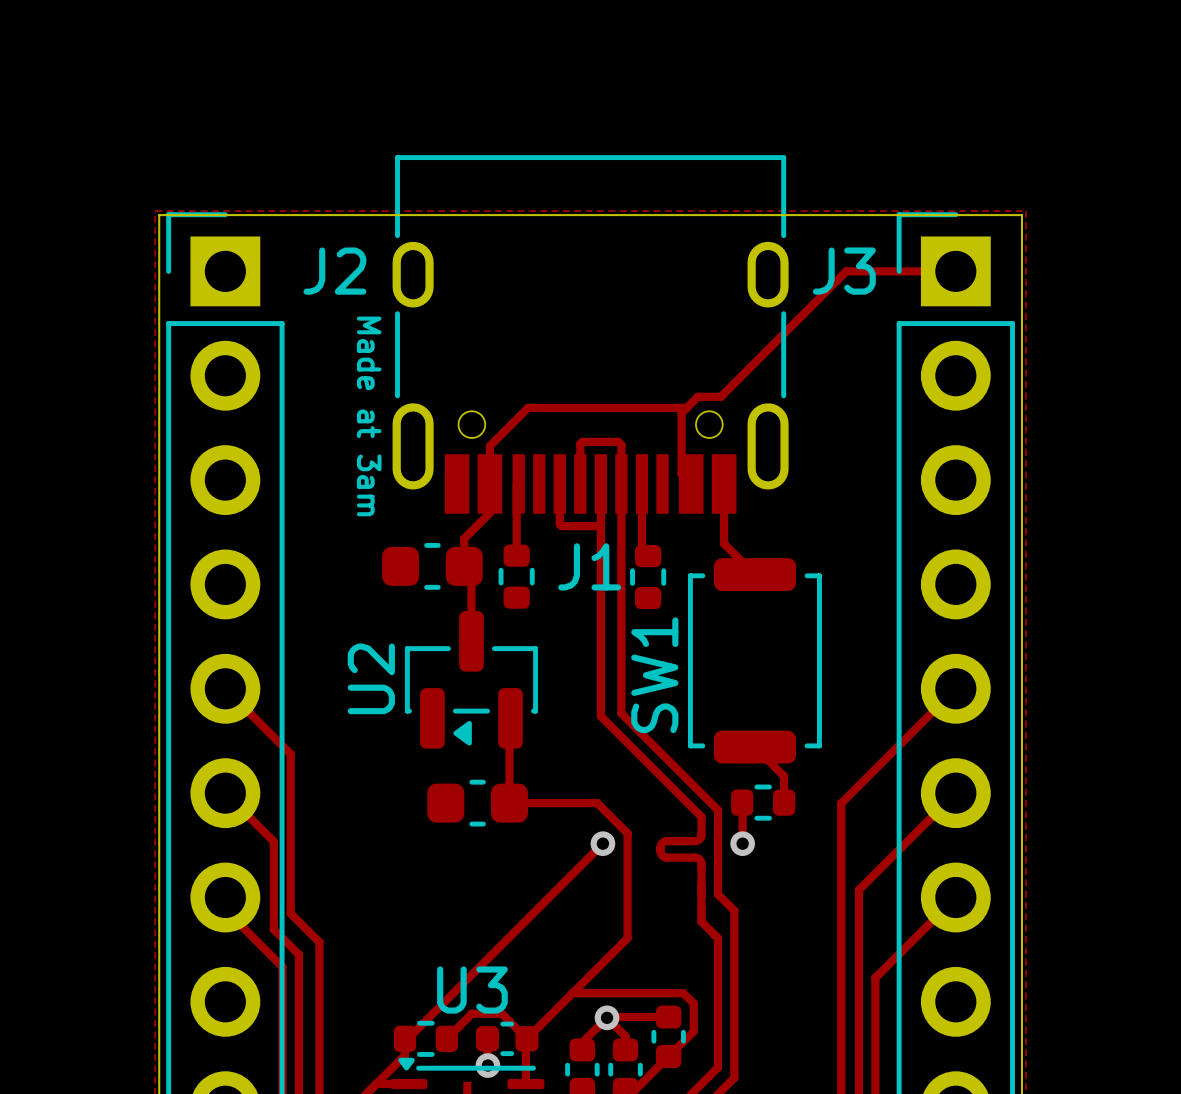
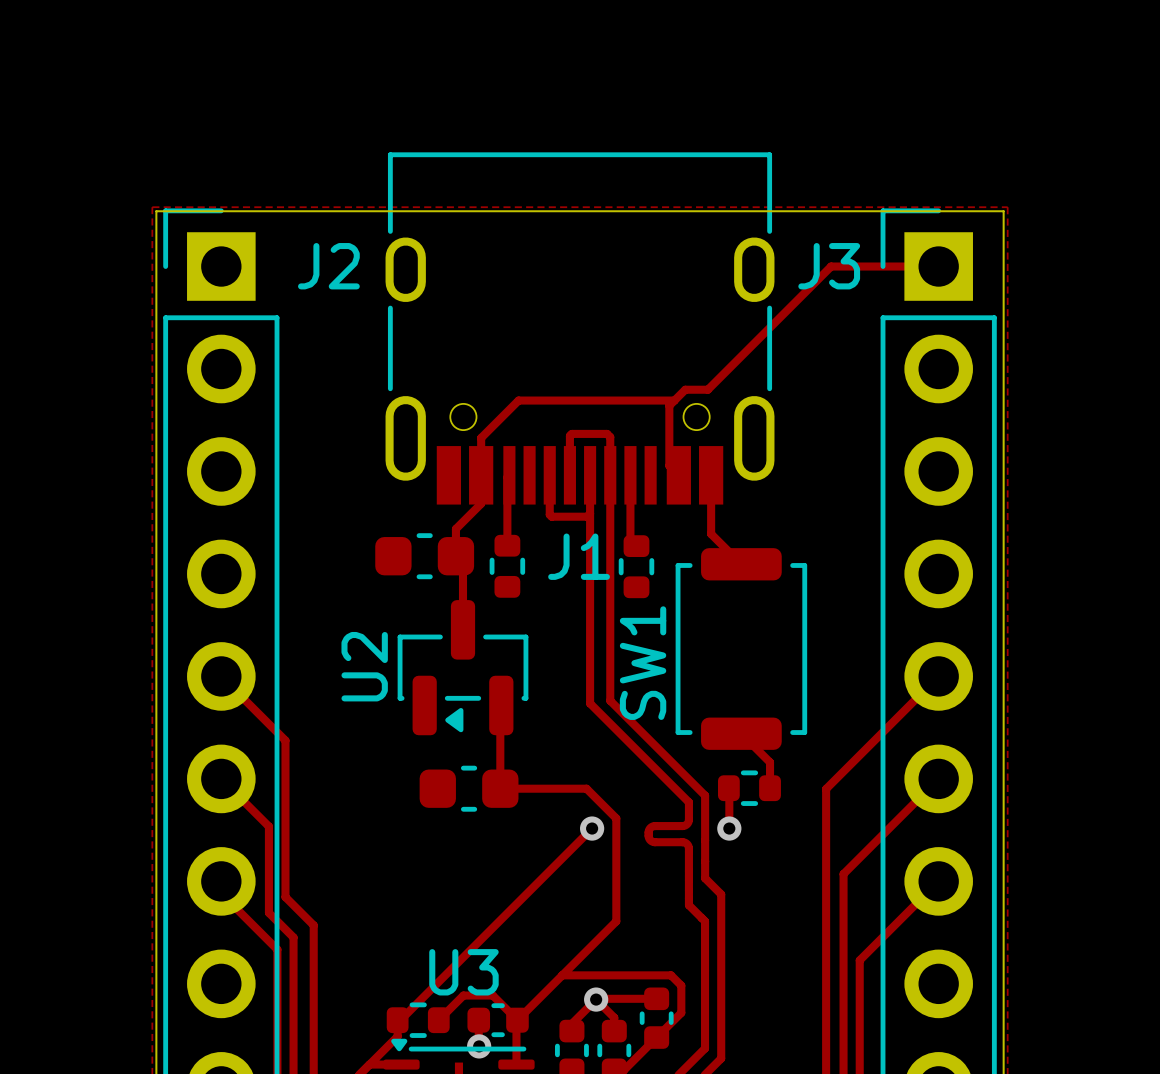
text: Made at 3am (369, 416) -> none

